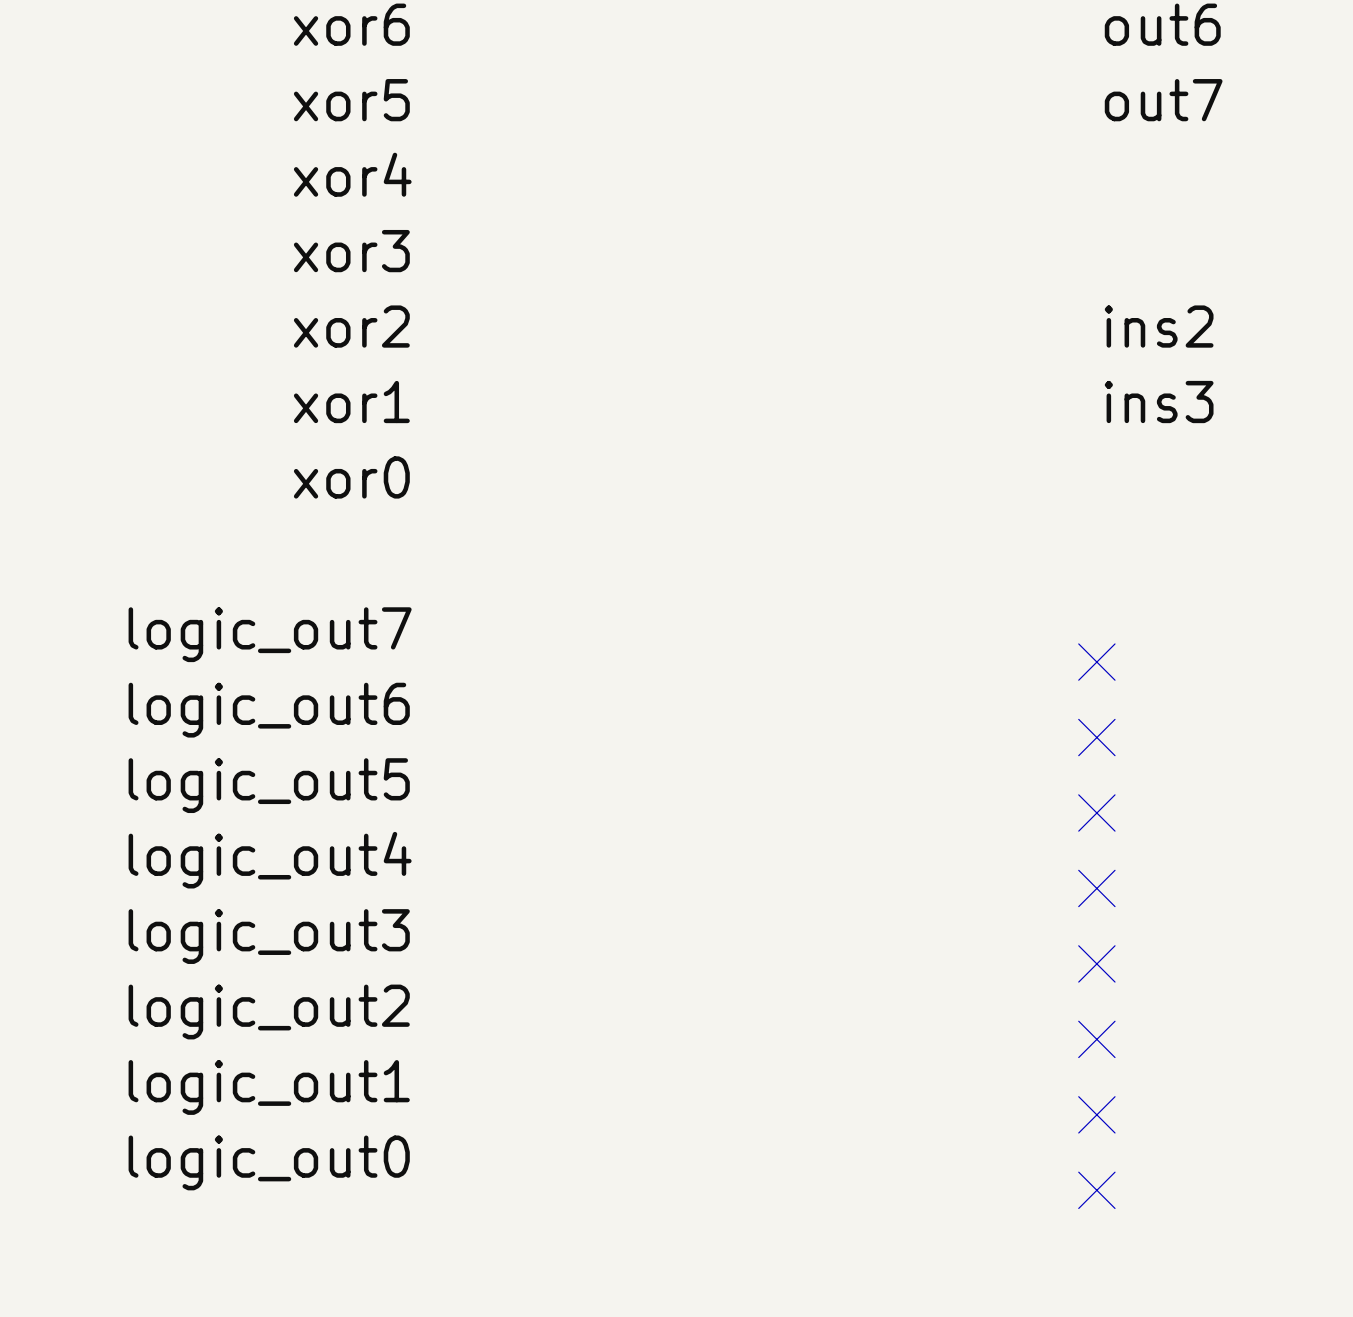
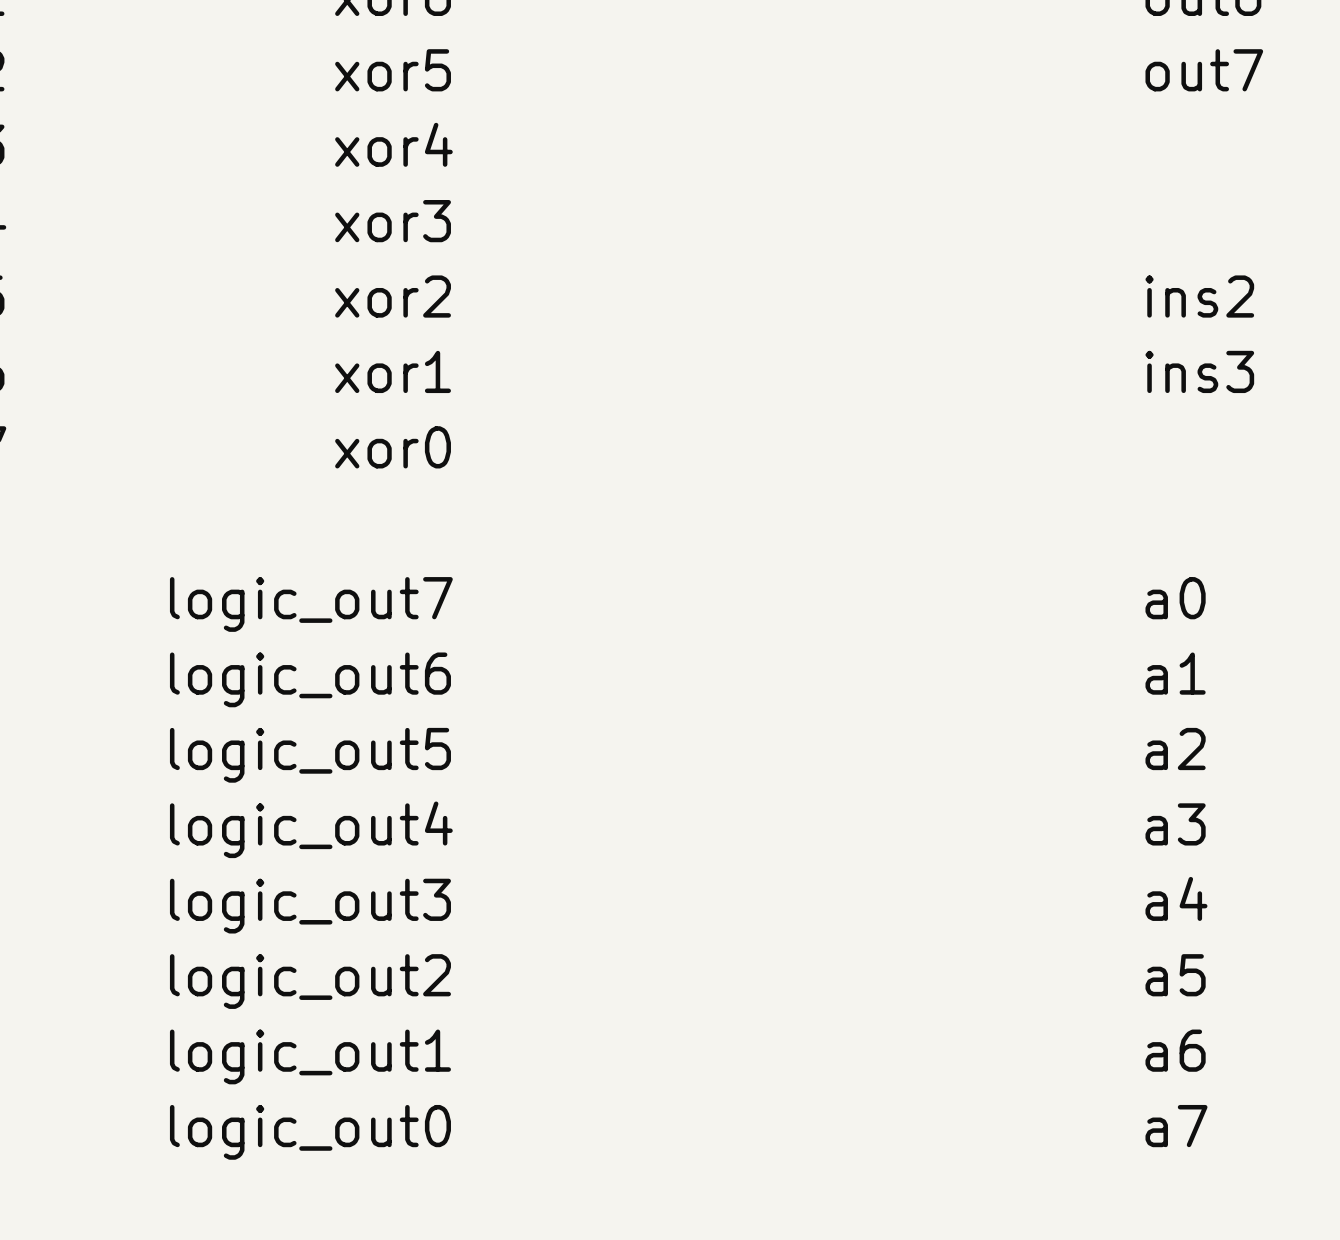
label: none -> a0 (1175, 598)
no-connect mark: (1096, 662) -> none
label: none -> a1 (1175, 673)
no-connect mark: (1096, 737) -> none
label: none -> a2 (1175, 749)
no-connect mark: (1096, 813) -> none
label: none -> a3 (1175, 824)
no-connect mark: (1096, 888) -> none
label: none -> a4 (1176, 898)
no-connect mark: (1096, 963) -> none
label: none -> a5 (1175, 975)
no-connect mark: (1096, 1039) -> none
label: none -> a6 (1175, 1050)
no-connect mark: (1096, 1114) -> none
label: none -> a7 (1176, 1126)
no-connect mark: (1096, 1190) -> none

